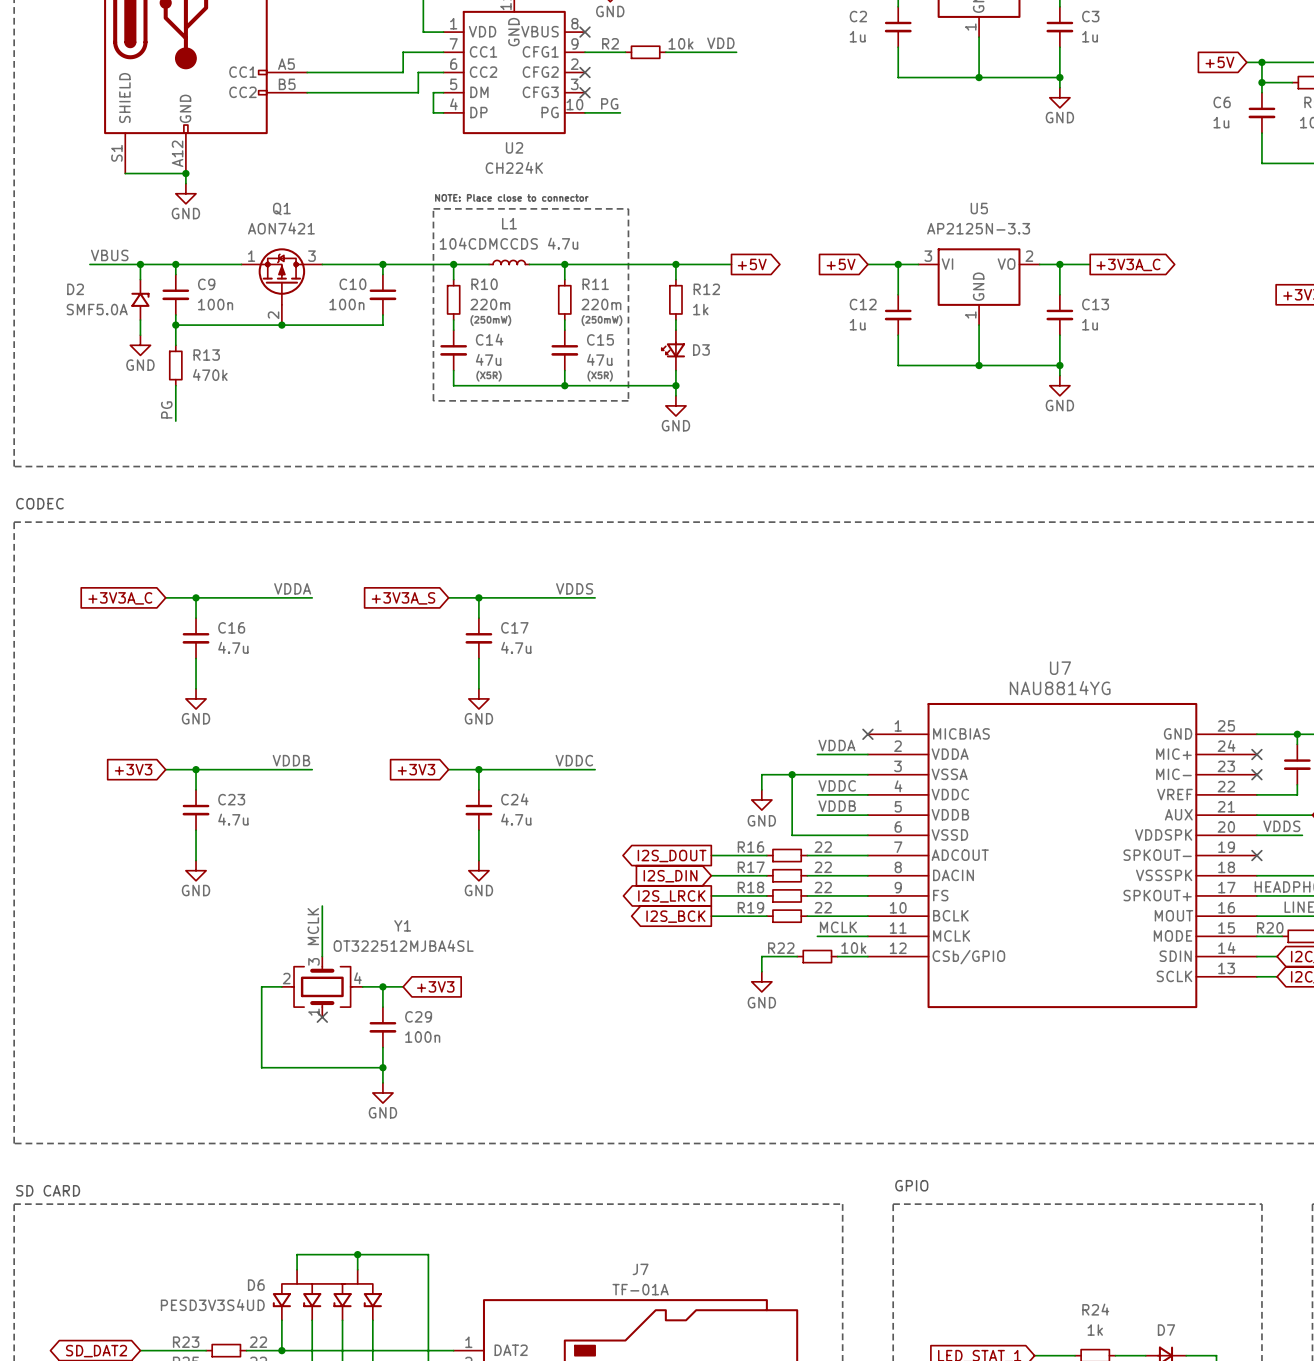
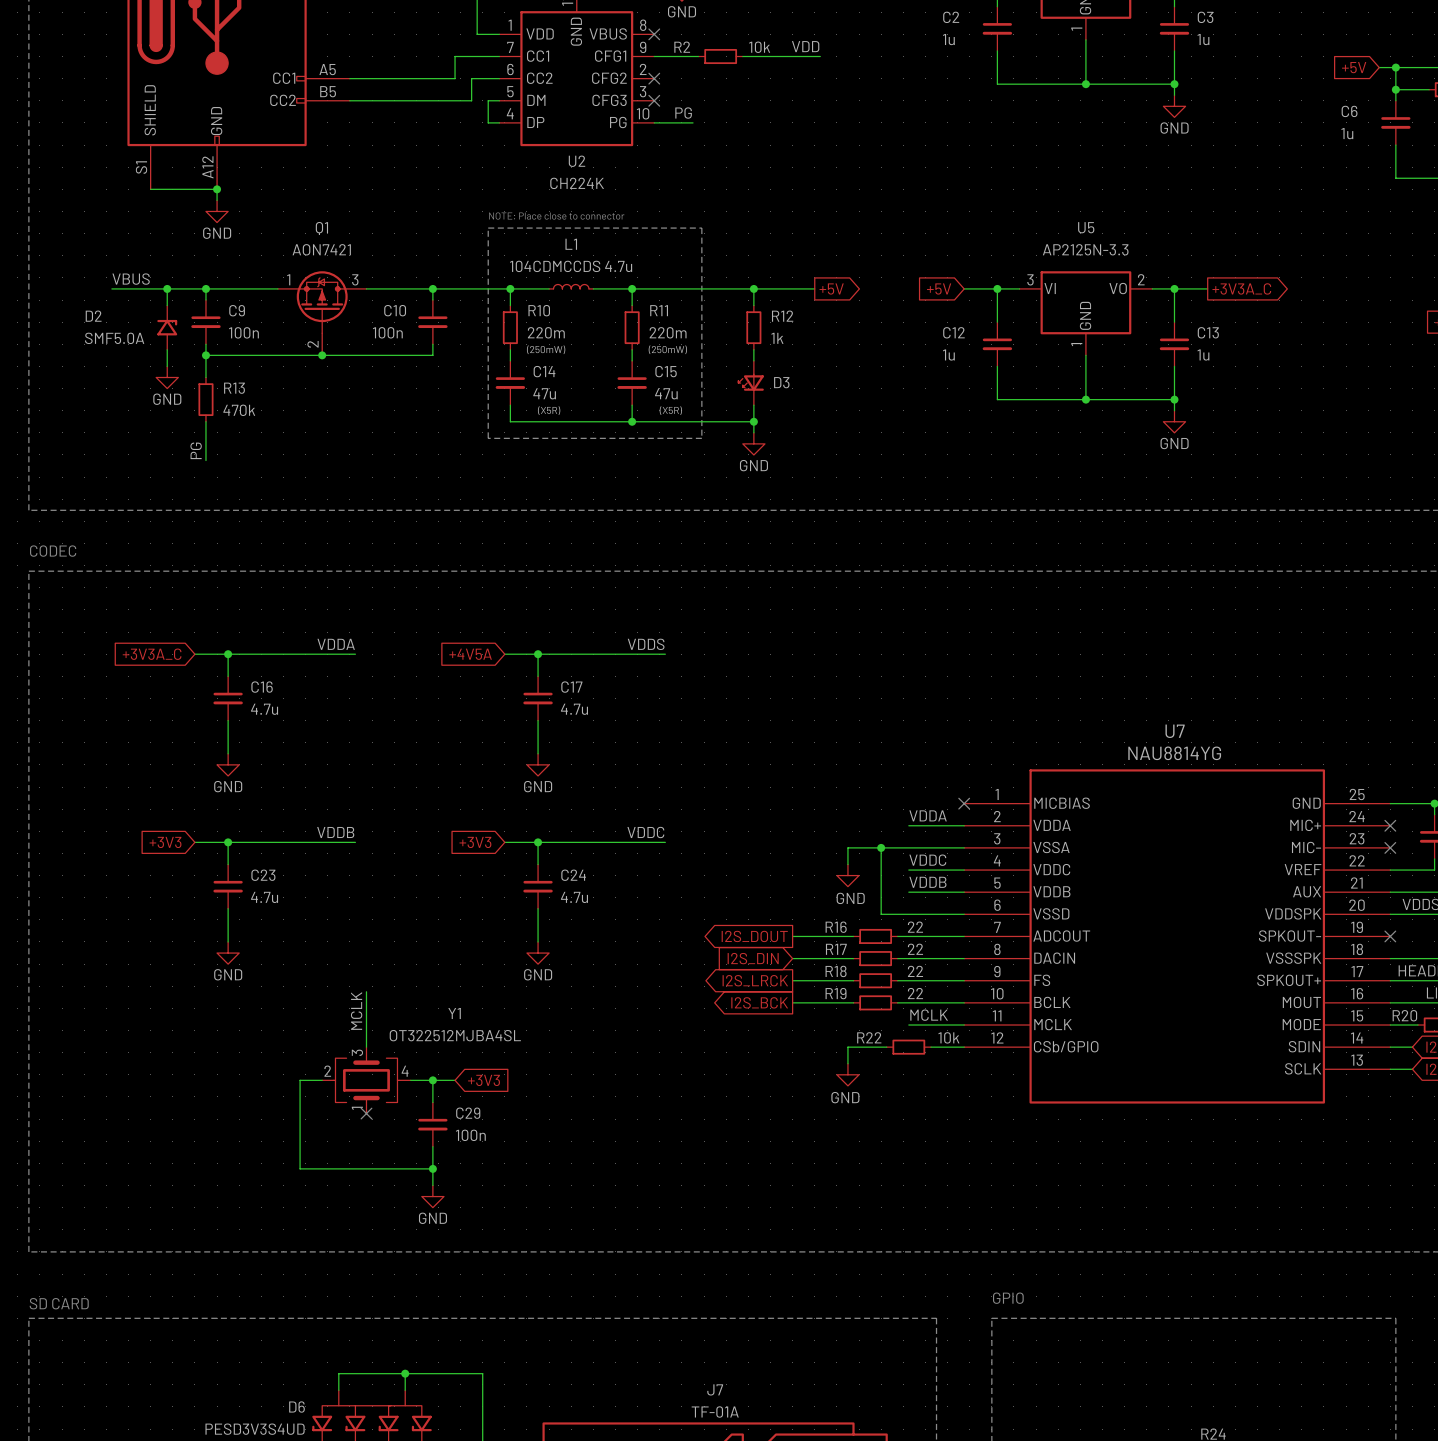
global label: +3V3A_S (403, 598) -> +4V5A (470, 654)

